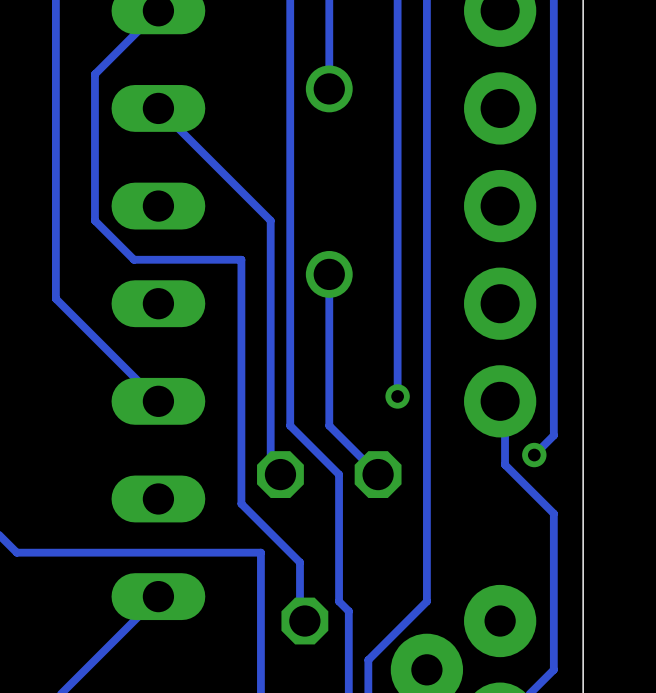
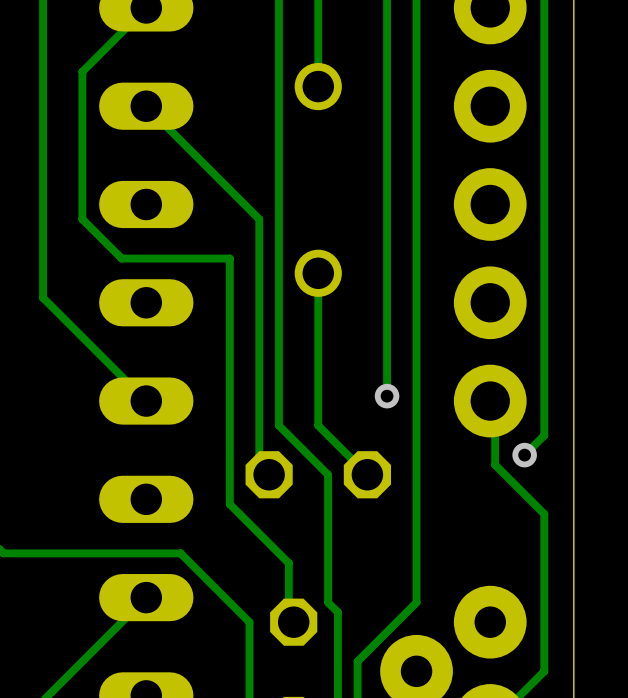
track: (192, 552) (260, 552) (260, 621) -> (180, 553) (249, 622)

